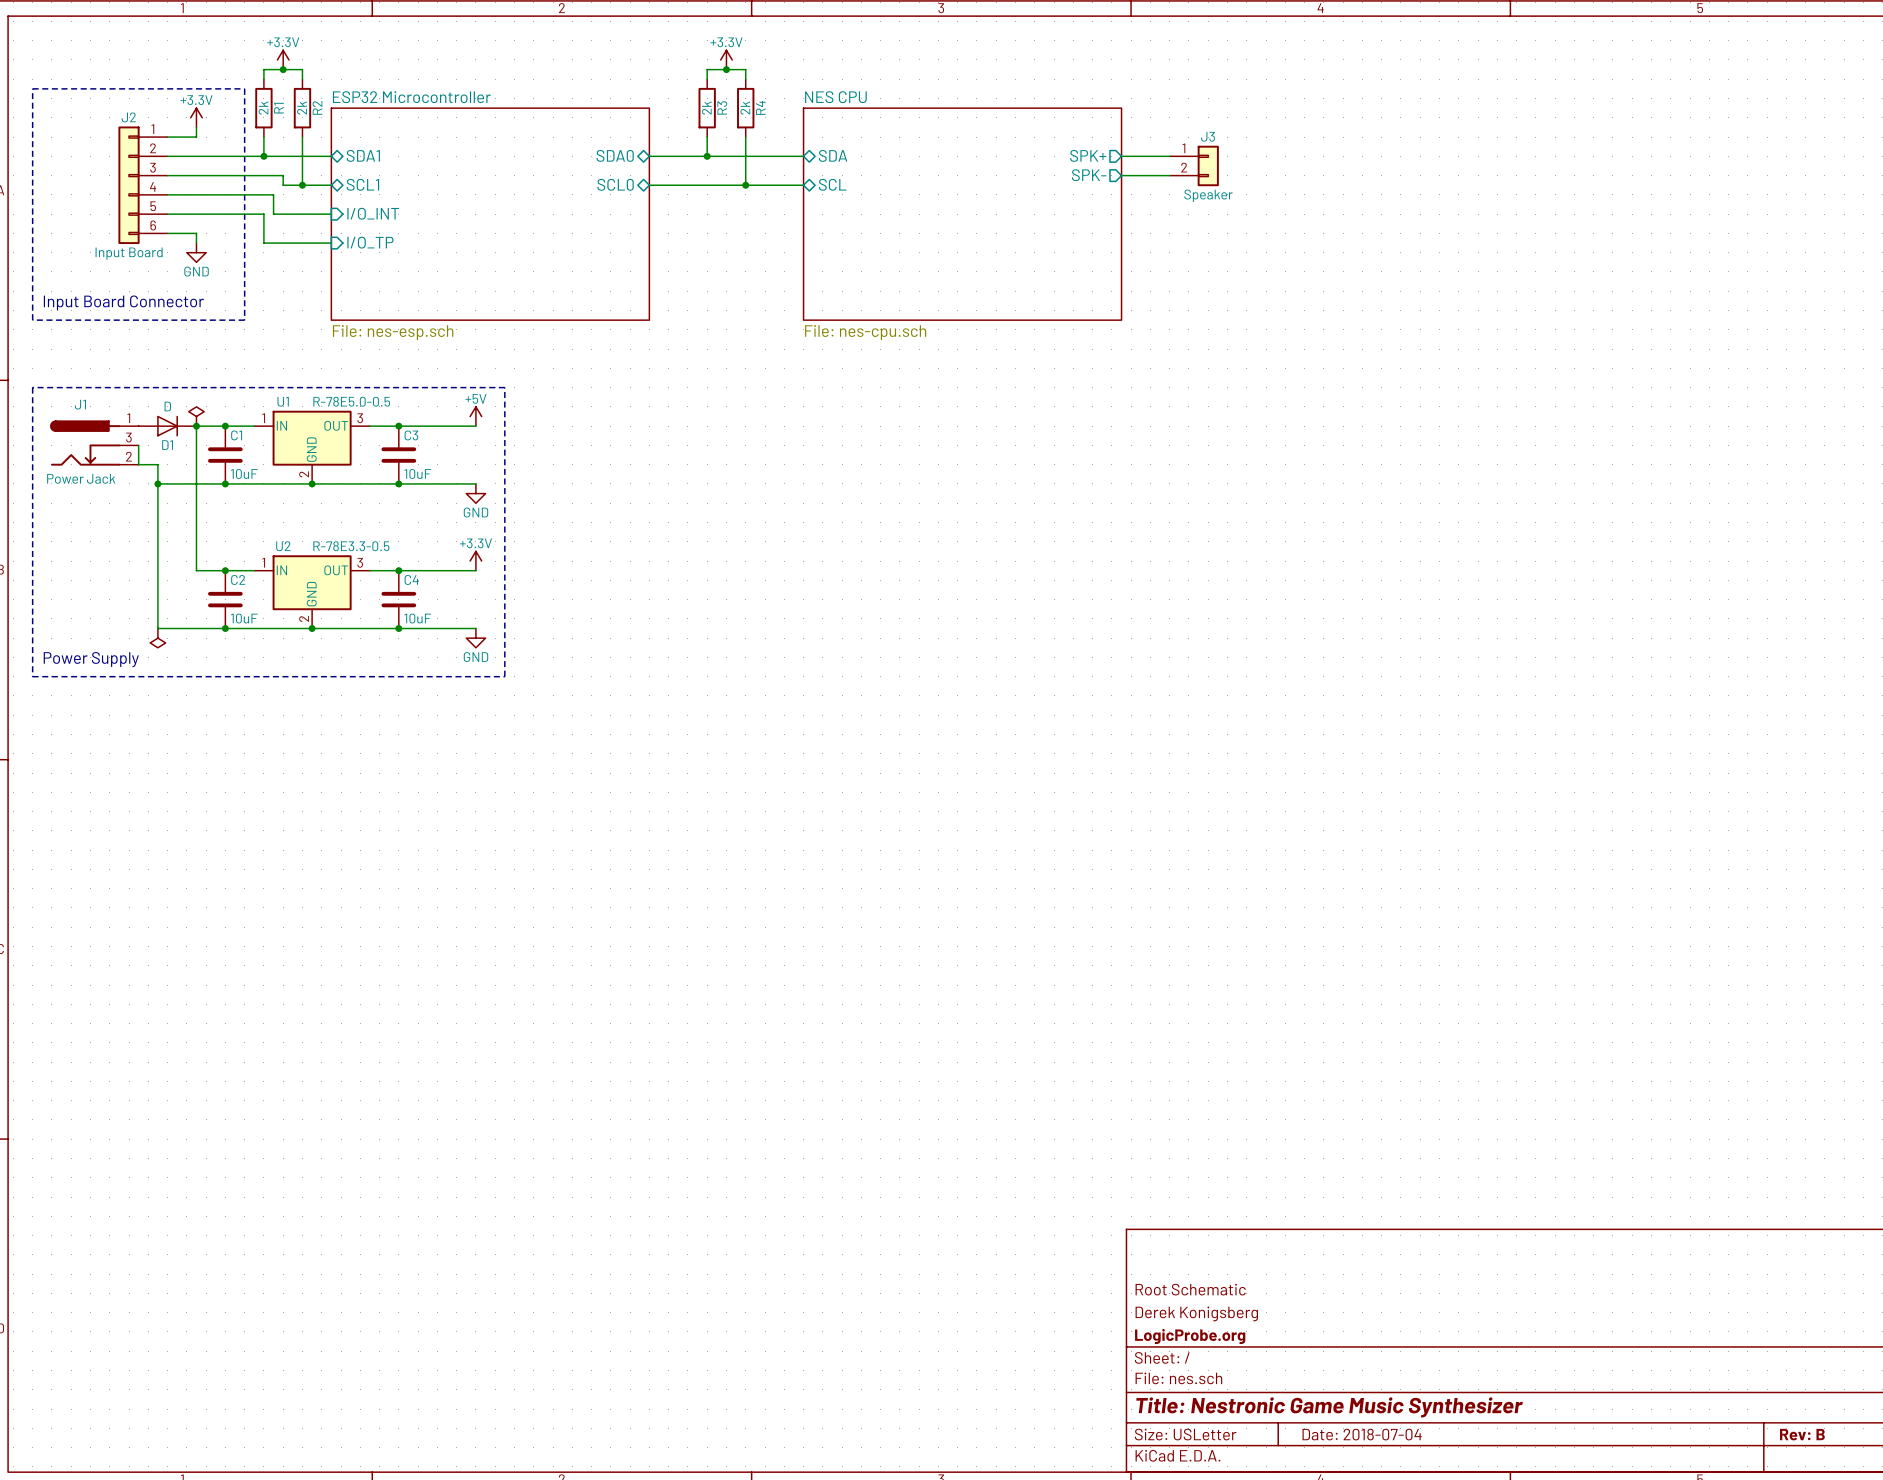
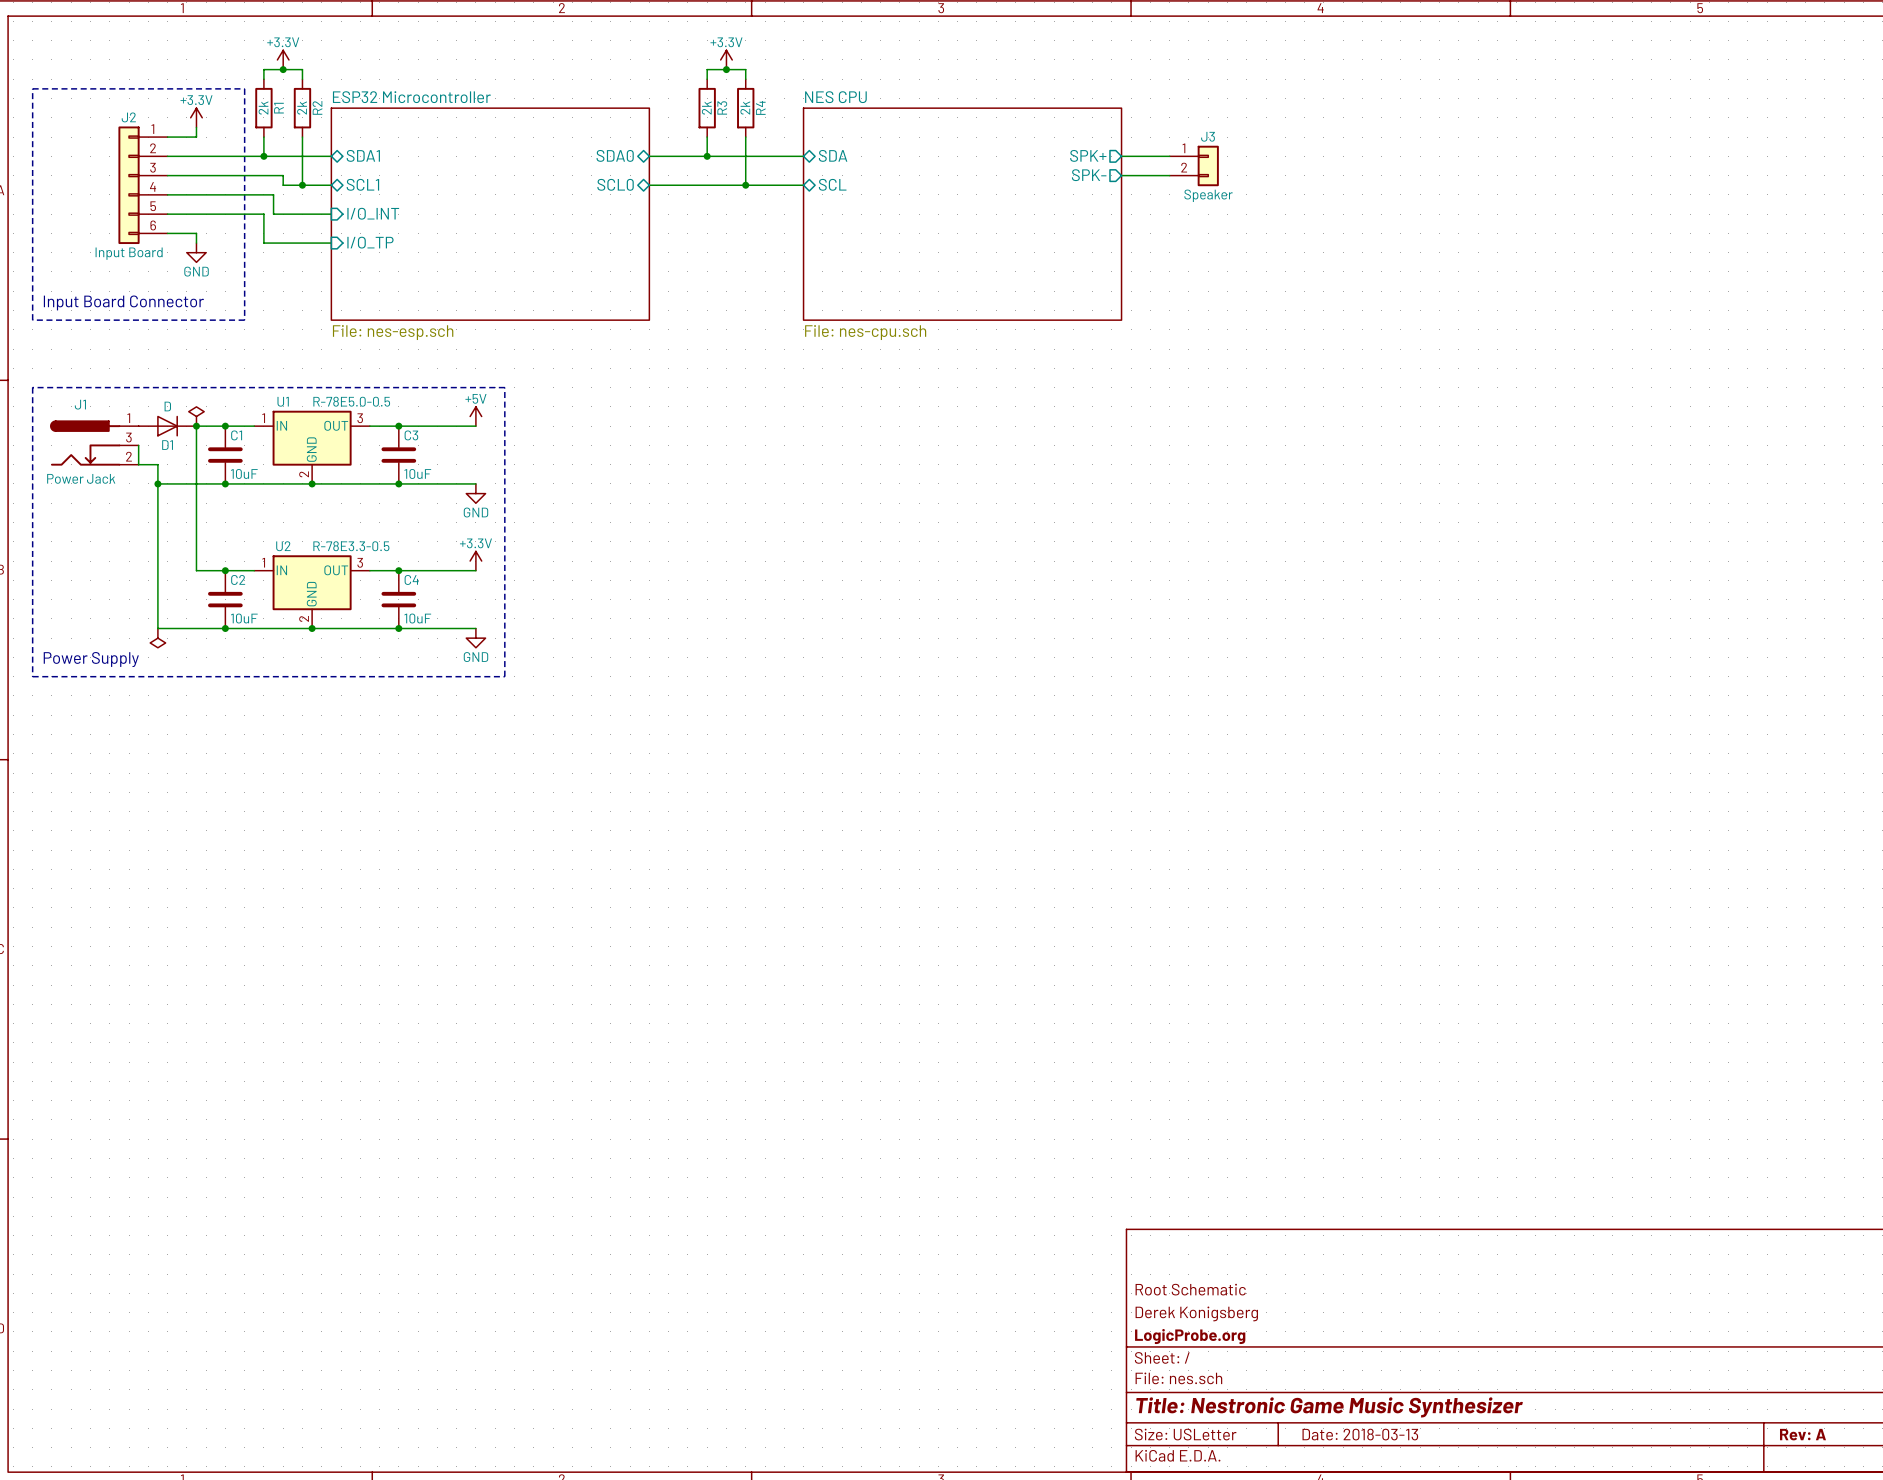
title block: Date: 2018-07-04 (1362, 1434) -> Date: 2018-03-13 (1360, 1434)
title block: Rev: B (1802, 1434) -> Rev: A (1802, 1434)

